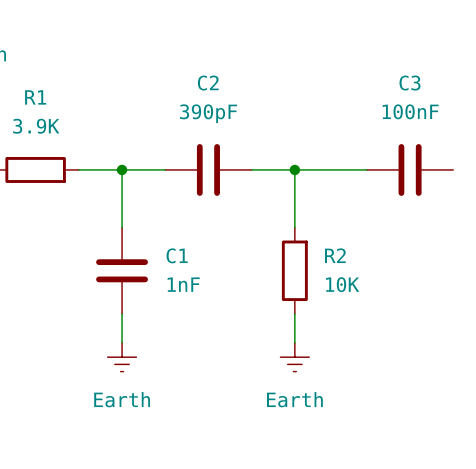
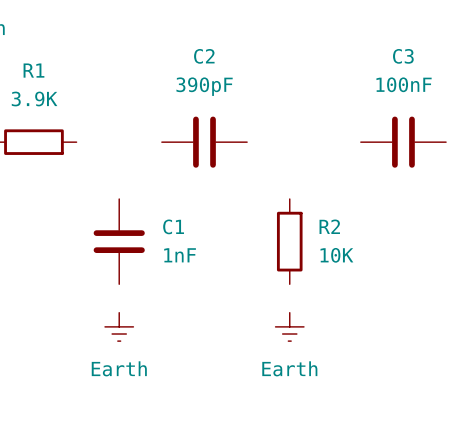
wire: (78, 169) (165, 169) -> none
wire: (122, 169) (122, 227) -> none
junction: (122, 169) -> none
wire: (251, 169) (366, 169) -> none
wire: (294, 169) (294, 227) -> none
junction: (294, 169) -> none
wire: (122, 313) (122, 342) -> none
wire: (294, 313) (294, 342) -> none

